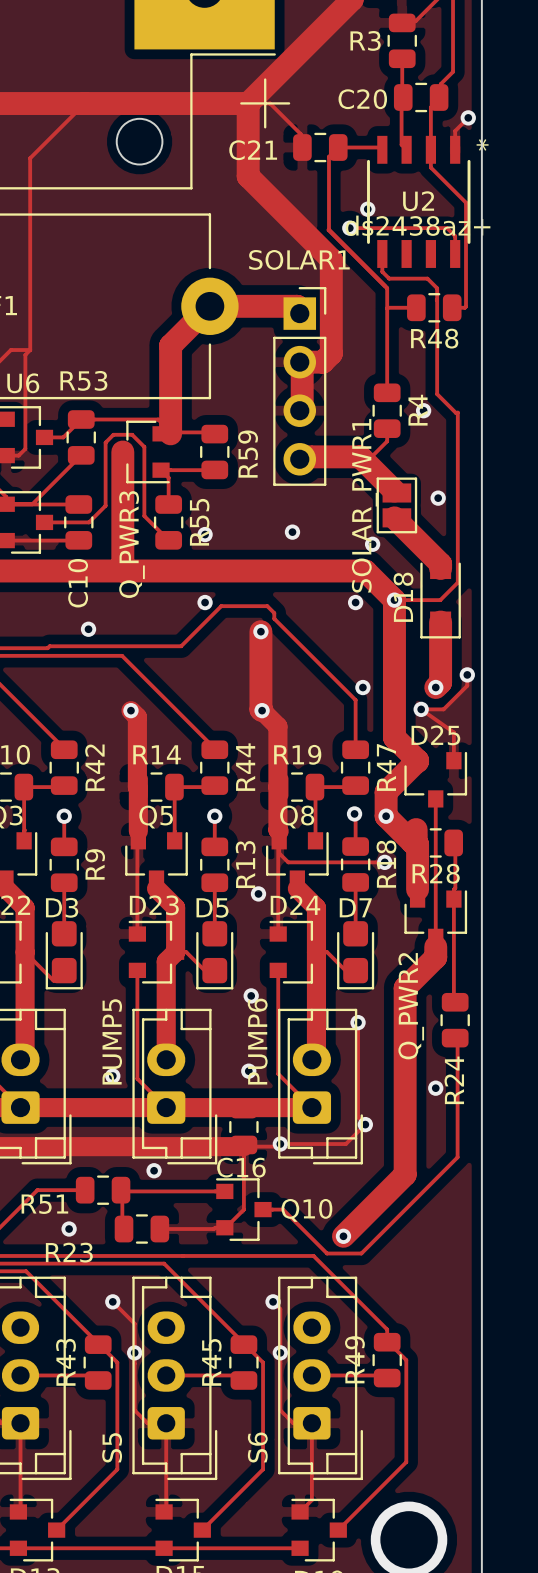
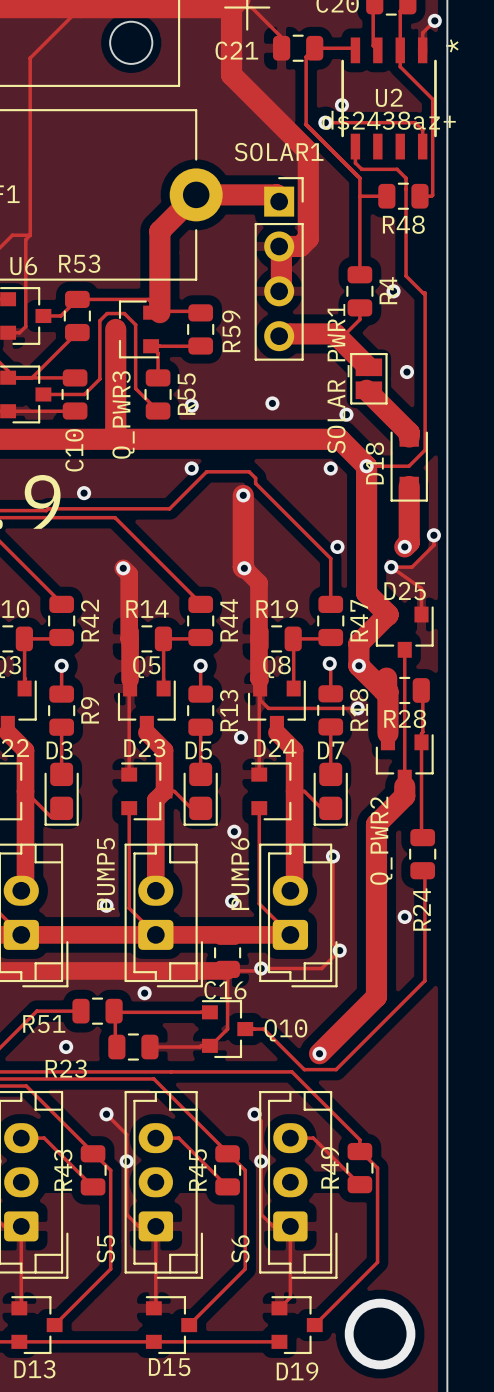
track: none -> (21, 1138) (44, 1138) (93, 1186)
track: none -> (155, 1138) (178, 1138) (227, 1186)
track: none -> (290, 1138) (313, 1138) (359, 1184)
track: (20, 1375) (92, 1375) -> none
track: (166, 1375) (237, 1375) -> none
track: (311, 1375) (383, 1375) -> none

